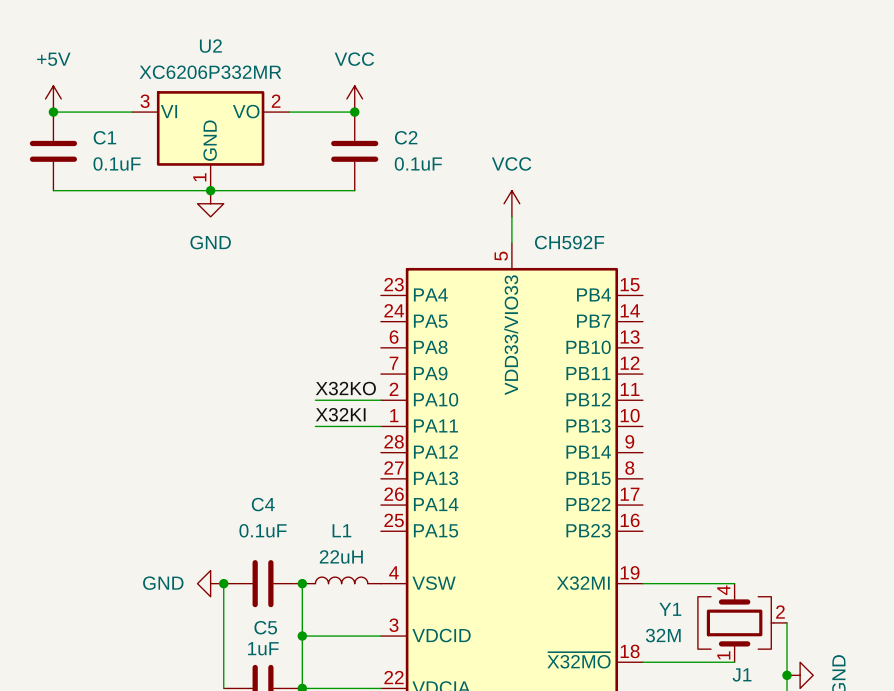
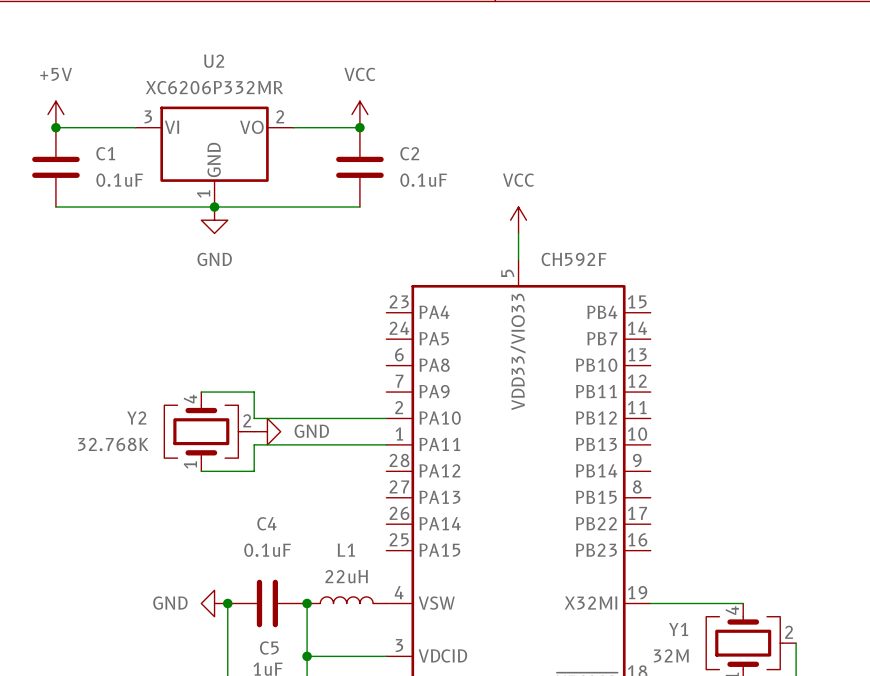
wire: none -> (201, 392) (254, 392) (254, 418) (320, 418)
label: X32KO (345, 388) -> none
Y2: none -> 32.768K (209, 431)
power symbol: none -> GND (267, 431)
label: X32KI (340, 414) -> none
wire: none -> (320, 444) (254, 444) (254, 471) (201, 471)

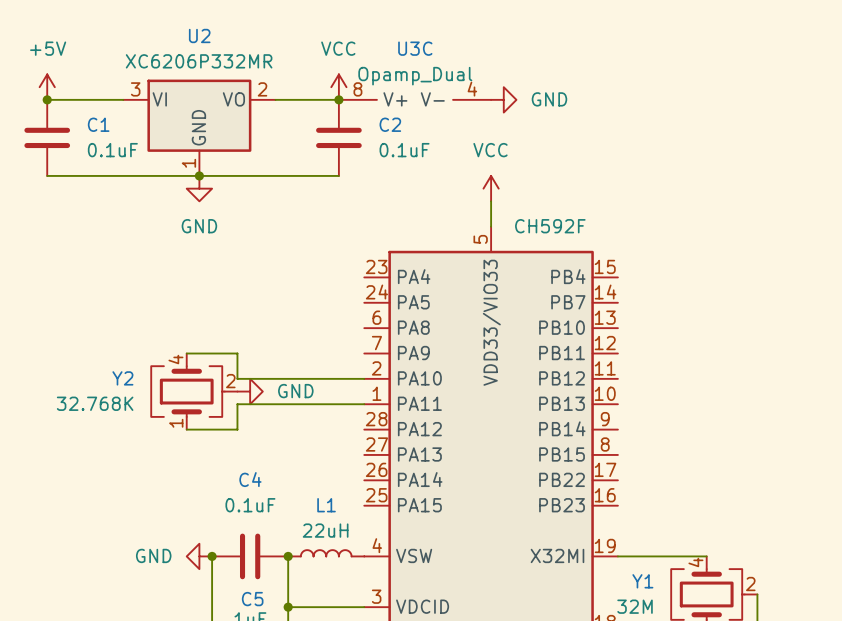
U3C: none -> Opamp_Dual (415, 99)
power symbol: none -> GND (503, 99)

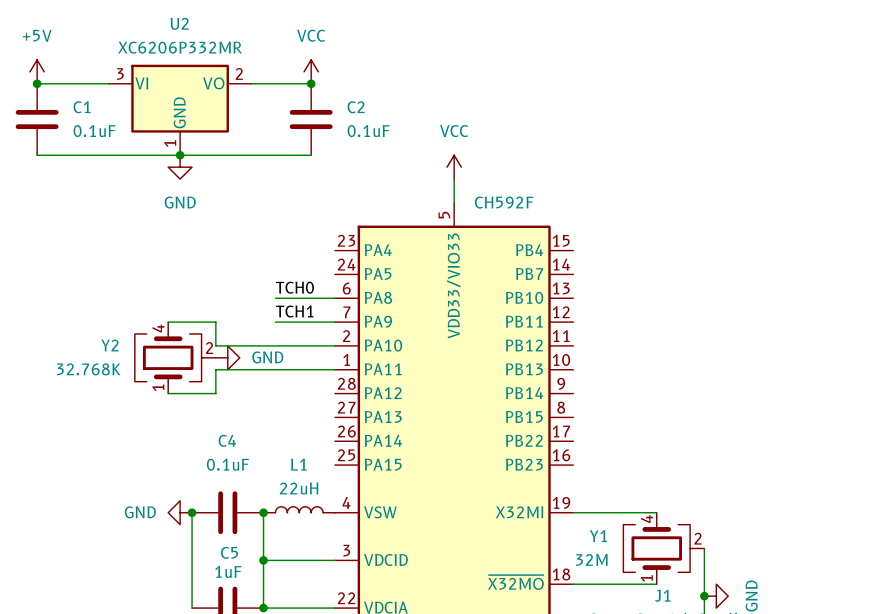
U3C: Opamp_Dual (415, 99) -> none
power symbol: GND (503, 99) -> none
label: none -> TCH0 (295, 287)
wire: none -> (275, 298) (335, 298)
label: none -> TCH1 (294, 311)
wire: none -> (275, 322) (335, 322)

